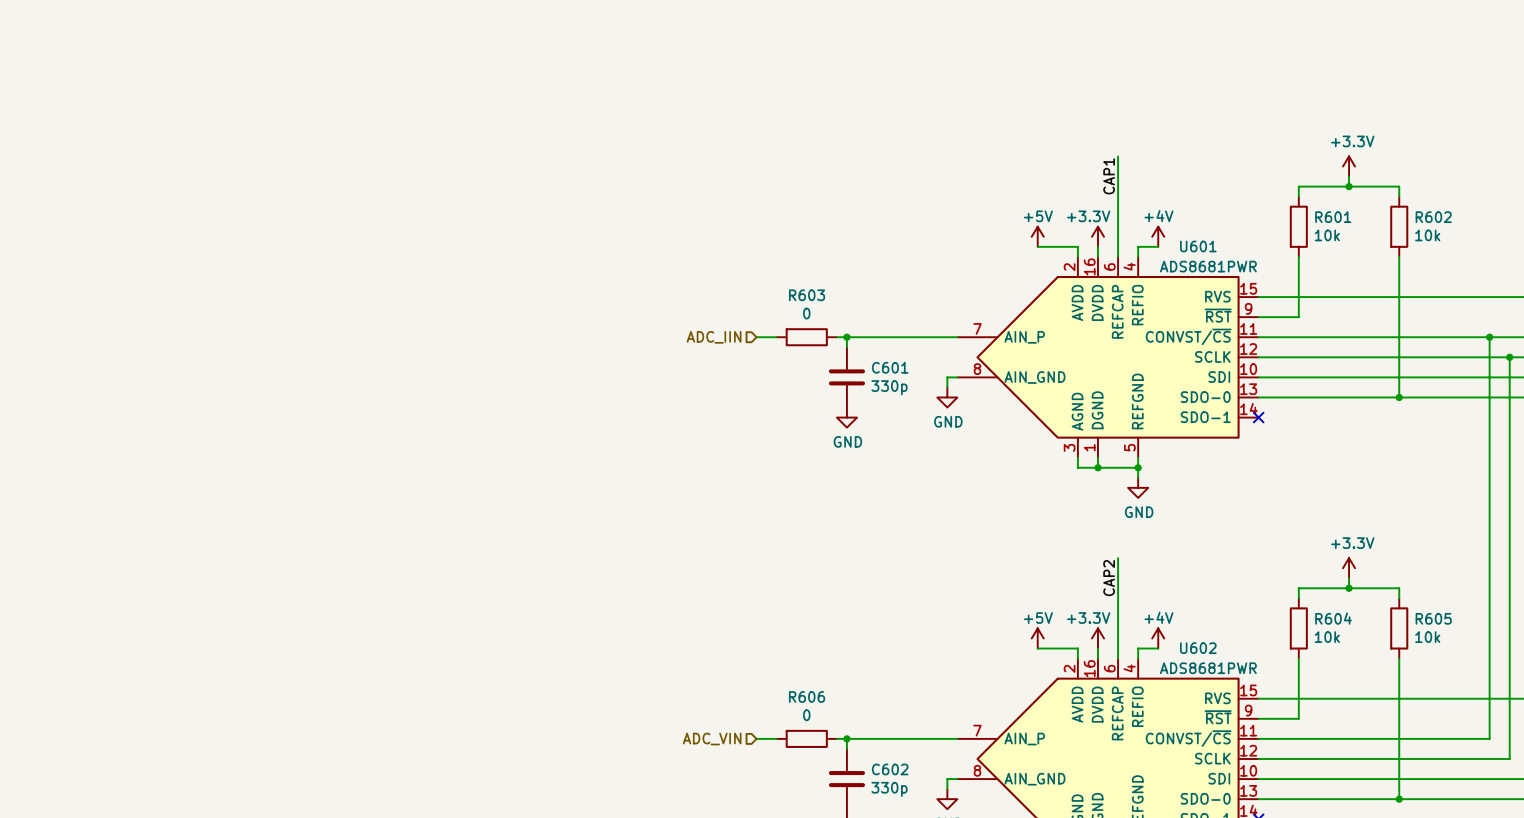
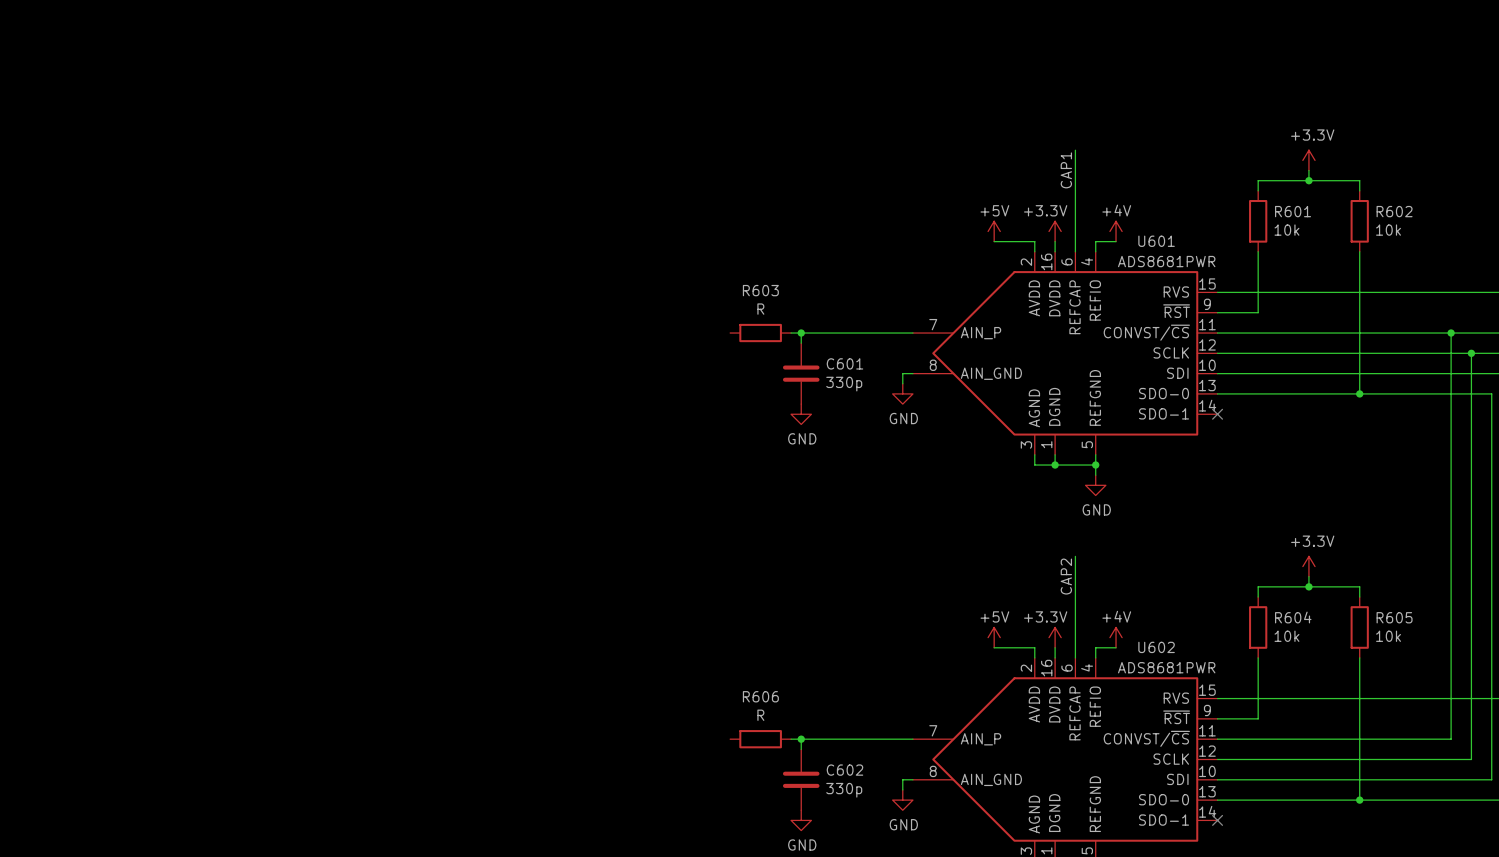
R603 value: 0 (806, 313) -> R (760, 309)
hierarchical label: ADC_IIN (714, 337) -> none
wire: (756, 337) (776, 337) -> none
R606 value: 0 (806, 715) -> R (760, 715)
wire: (756, 738) (776, 738) -> none
hierarchical label: ADC_VIN (712, 739) -> none

